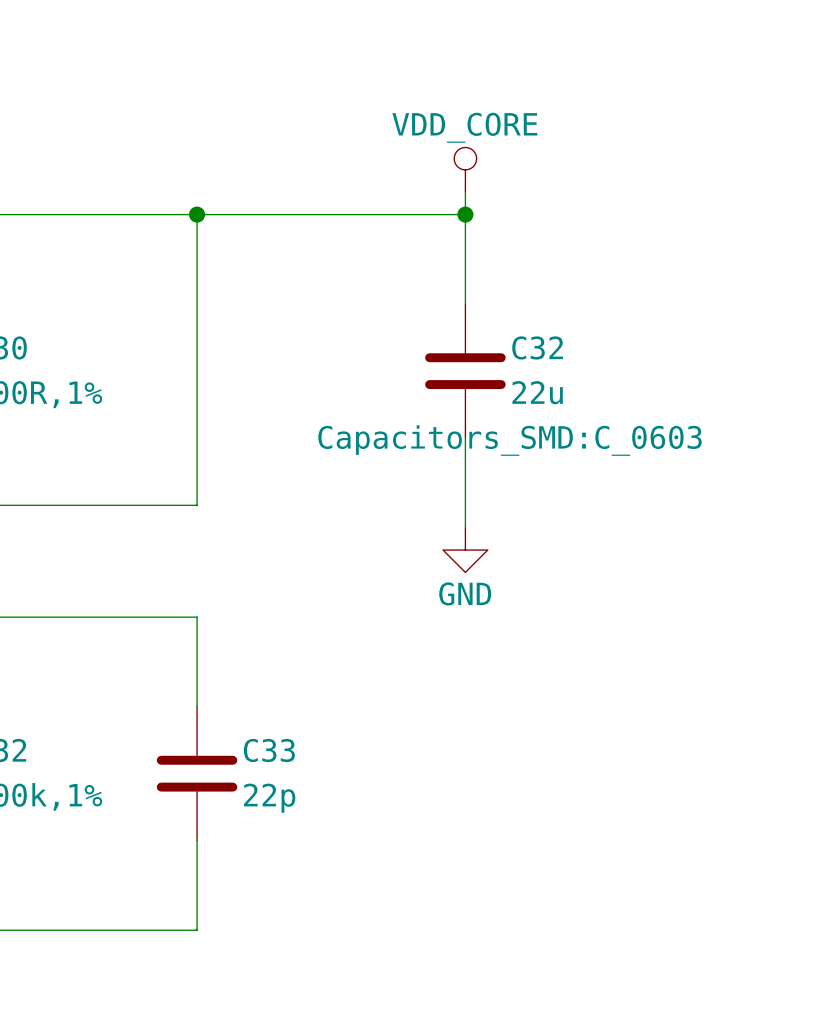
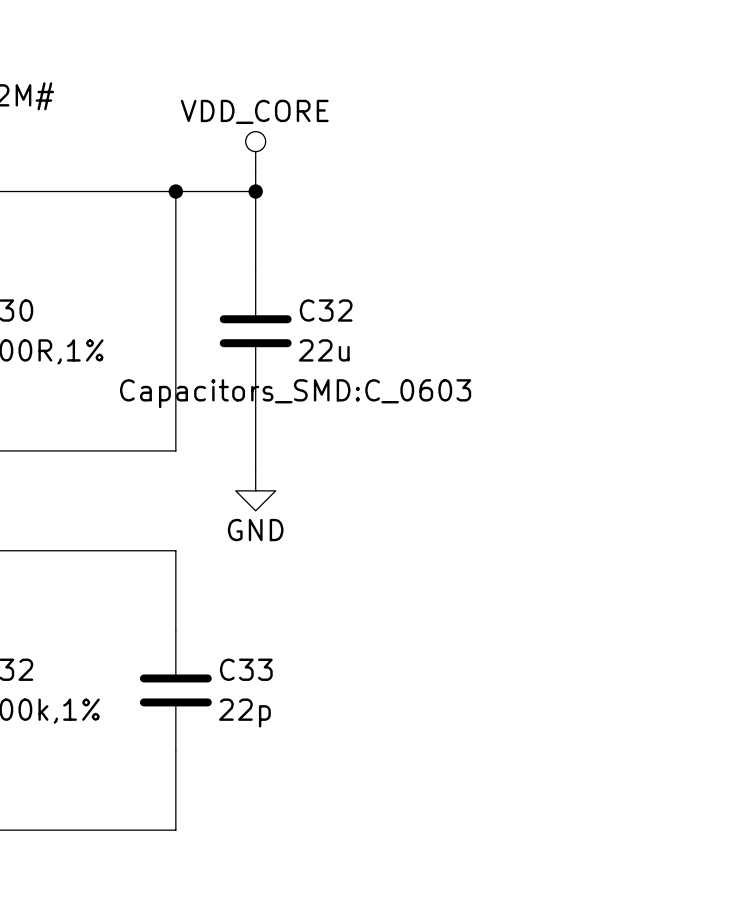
power symbol position: VDD_CORE (465, 169) -> VDD_CORE (255, 151)
wire: (465, 192) (465, 304) -> (255, 171) (255, 271)
wire: (286, 214) (465, 214) -> none
junction: none -> (255, 191)
junction: (465, 214) -> none
C32 position: (465, 371) -> (255, 331)
wire: (465, 438) (465, 527) -> (255, 391) (255, 470)
power symbol position: GND (465, 550) -> GND (255, 490)

